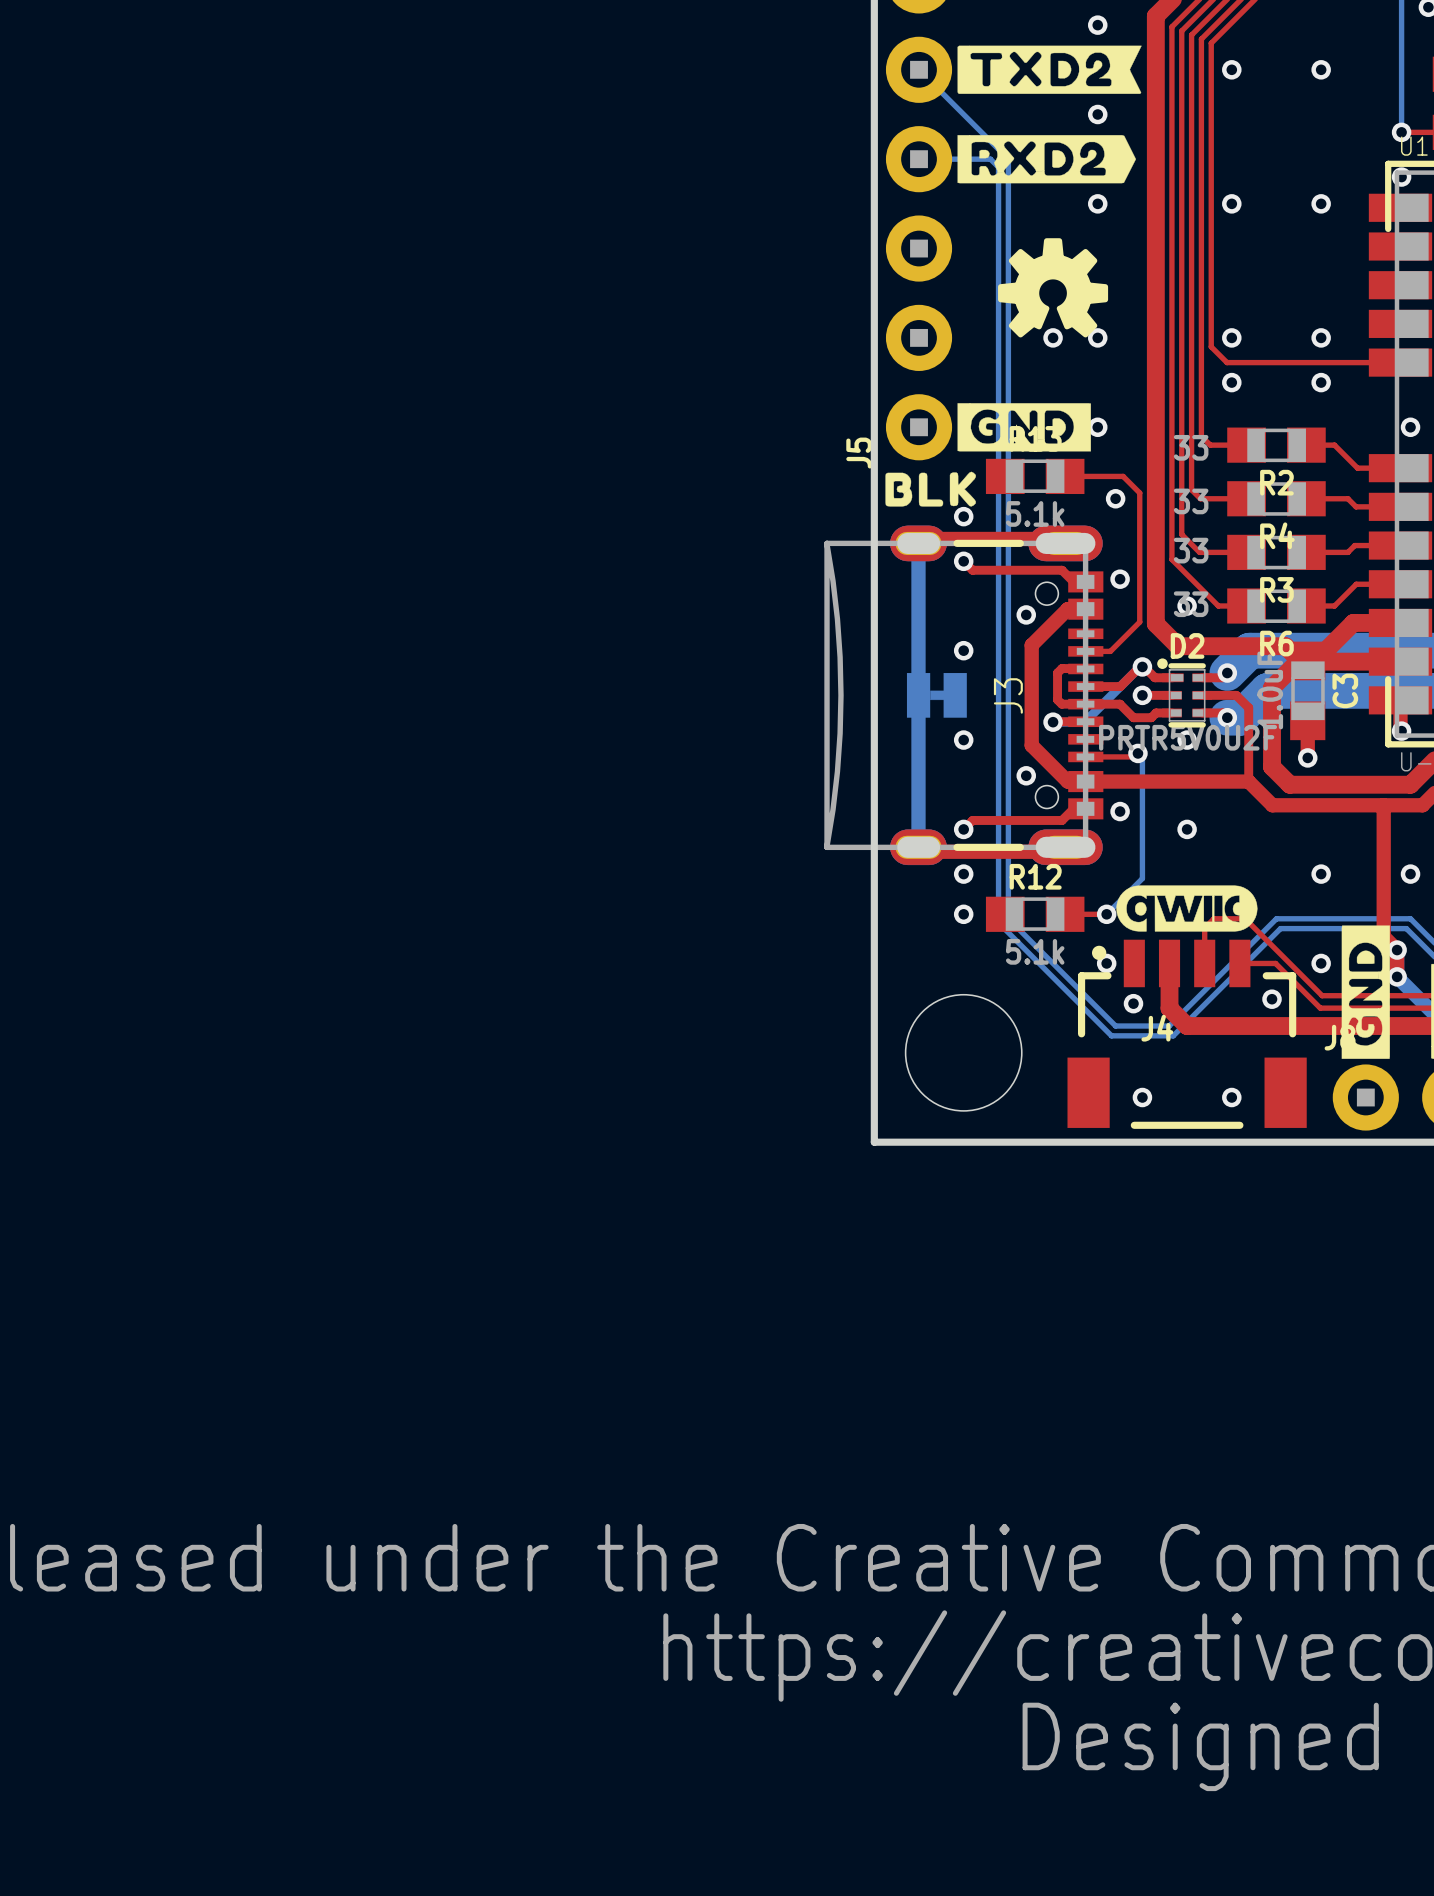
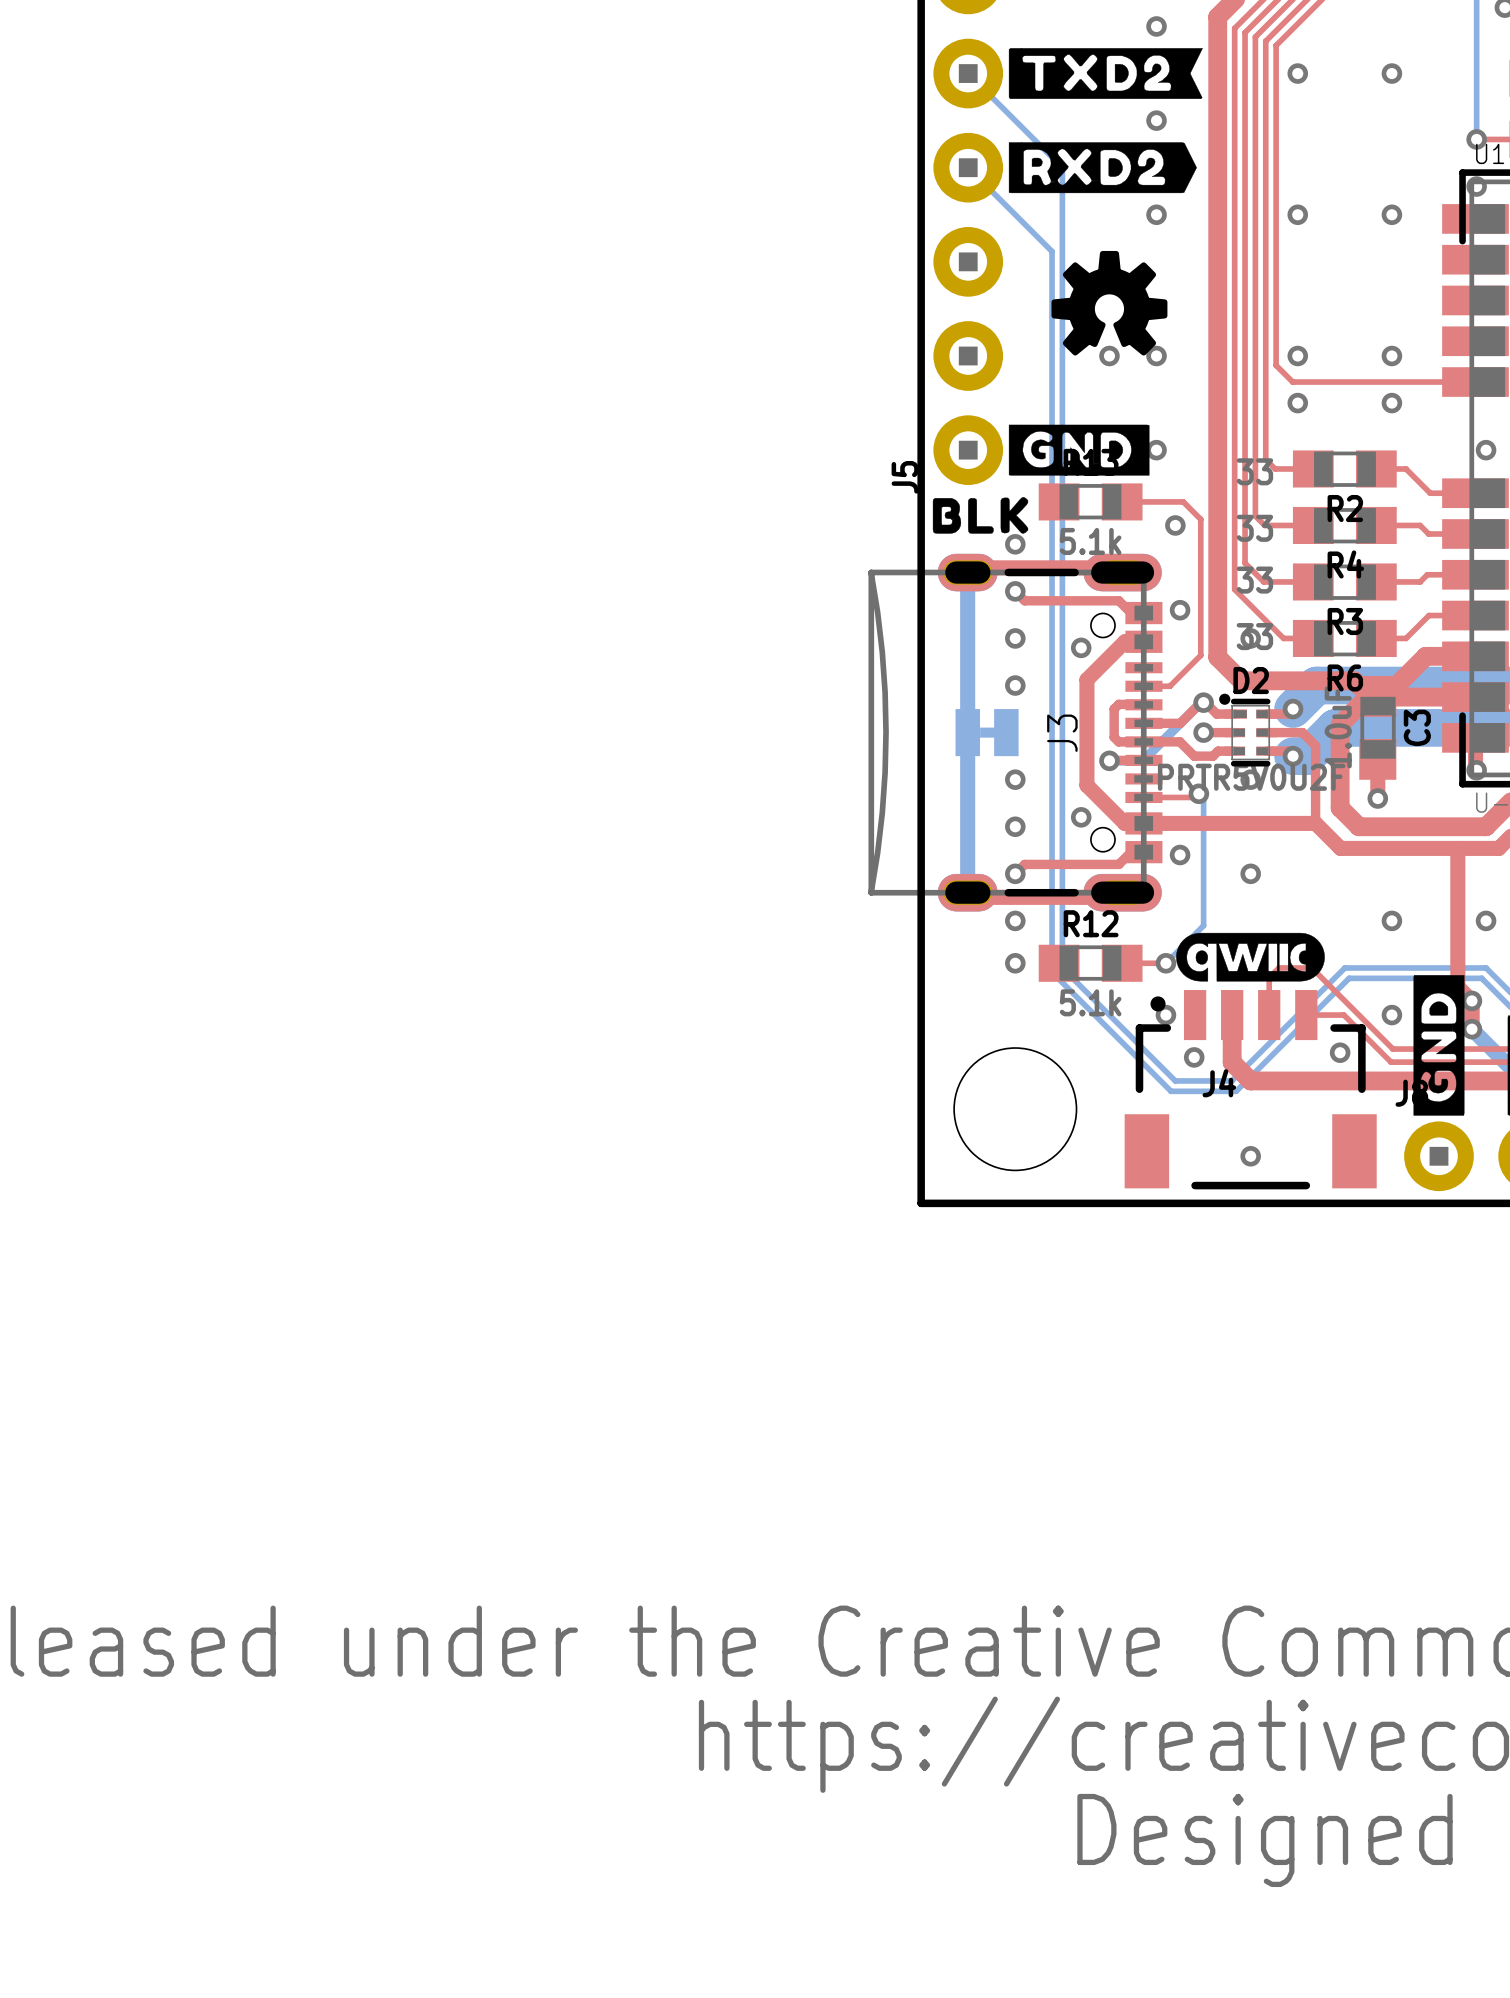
bottom track: (919, 159) (990, 159) (998, 167) (998, 238) -> (968, 167) (1052, 251)
via: none -> (1015, 638)
via: none -> (1015, 826)
via: (1142, 1097) -> none
via: none -> (1250, 1156)
via: (1231, 1097) -> none

